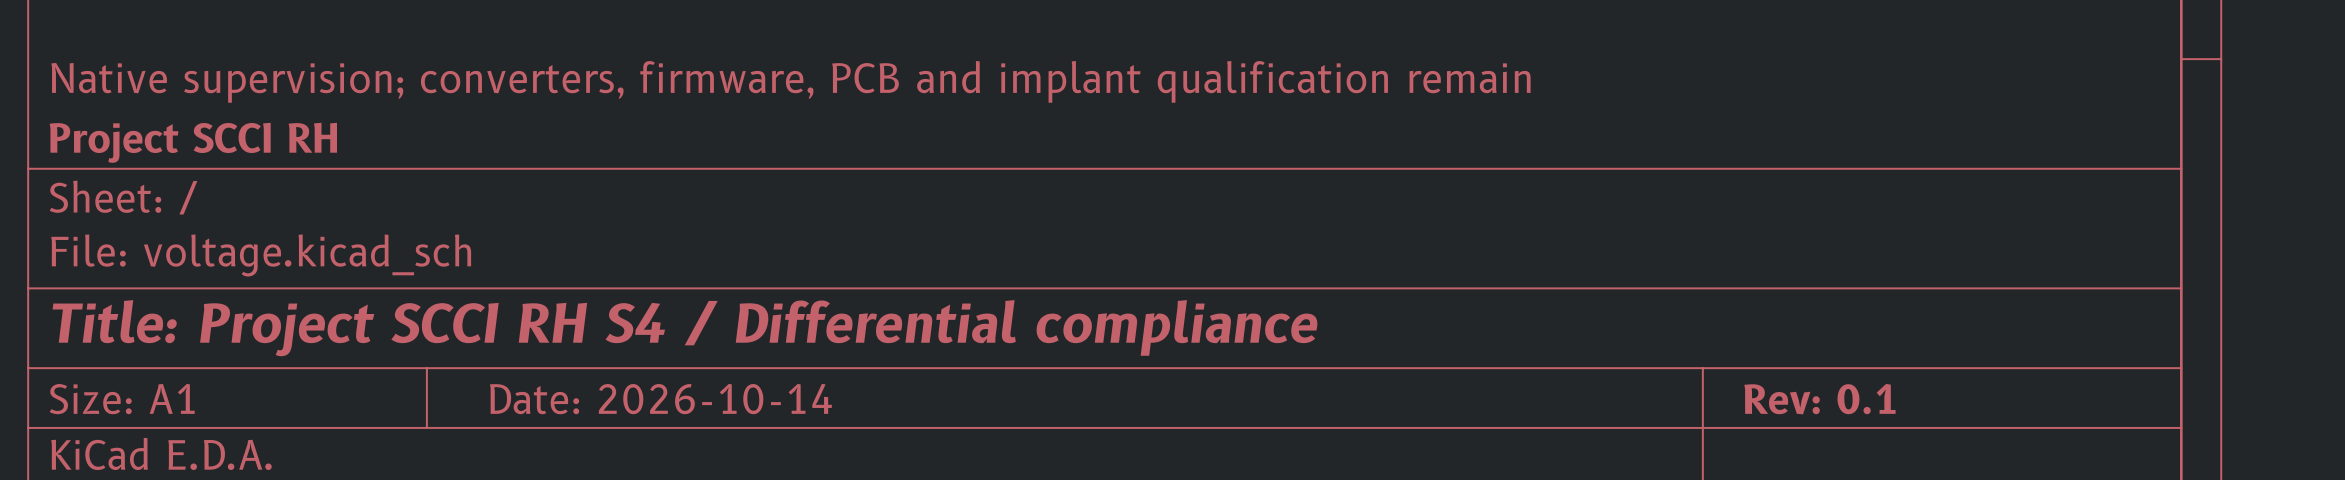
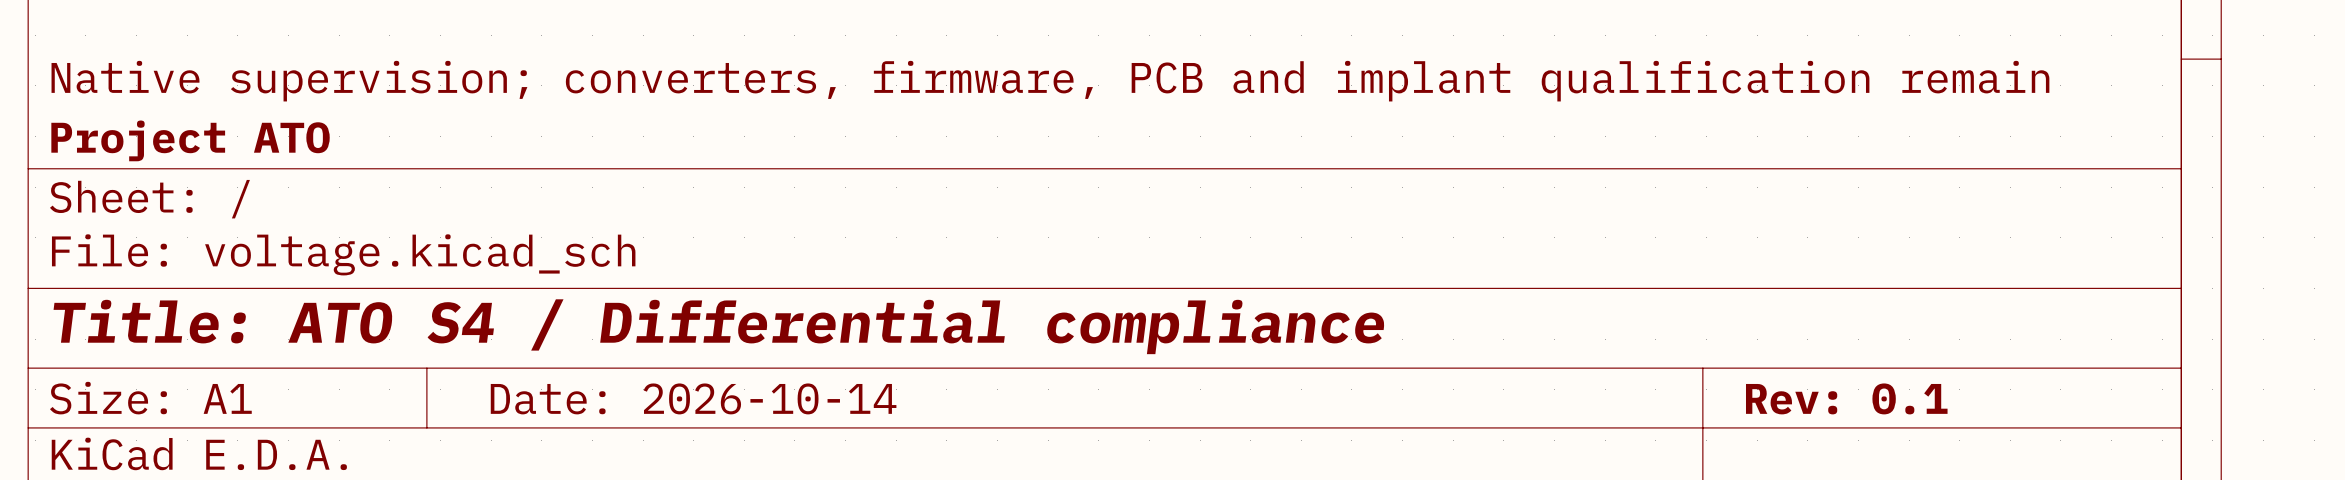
title block: Project SCCI RH (193, 142) -> Project ATO (190, 140)
title block: Title: Project SCCI RH S4 / Differential compliance (685, 328) -> Title: ATO S4 / Differential compliance (718, 326)

